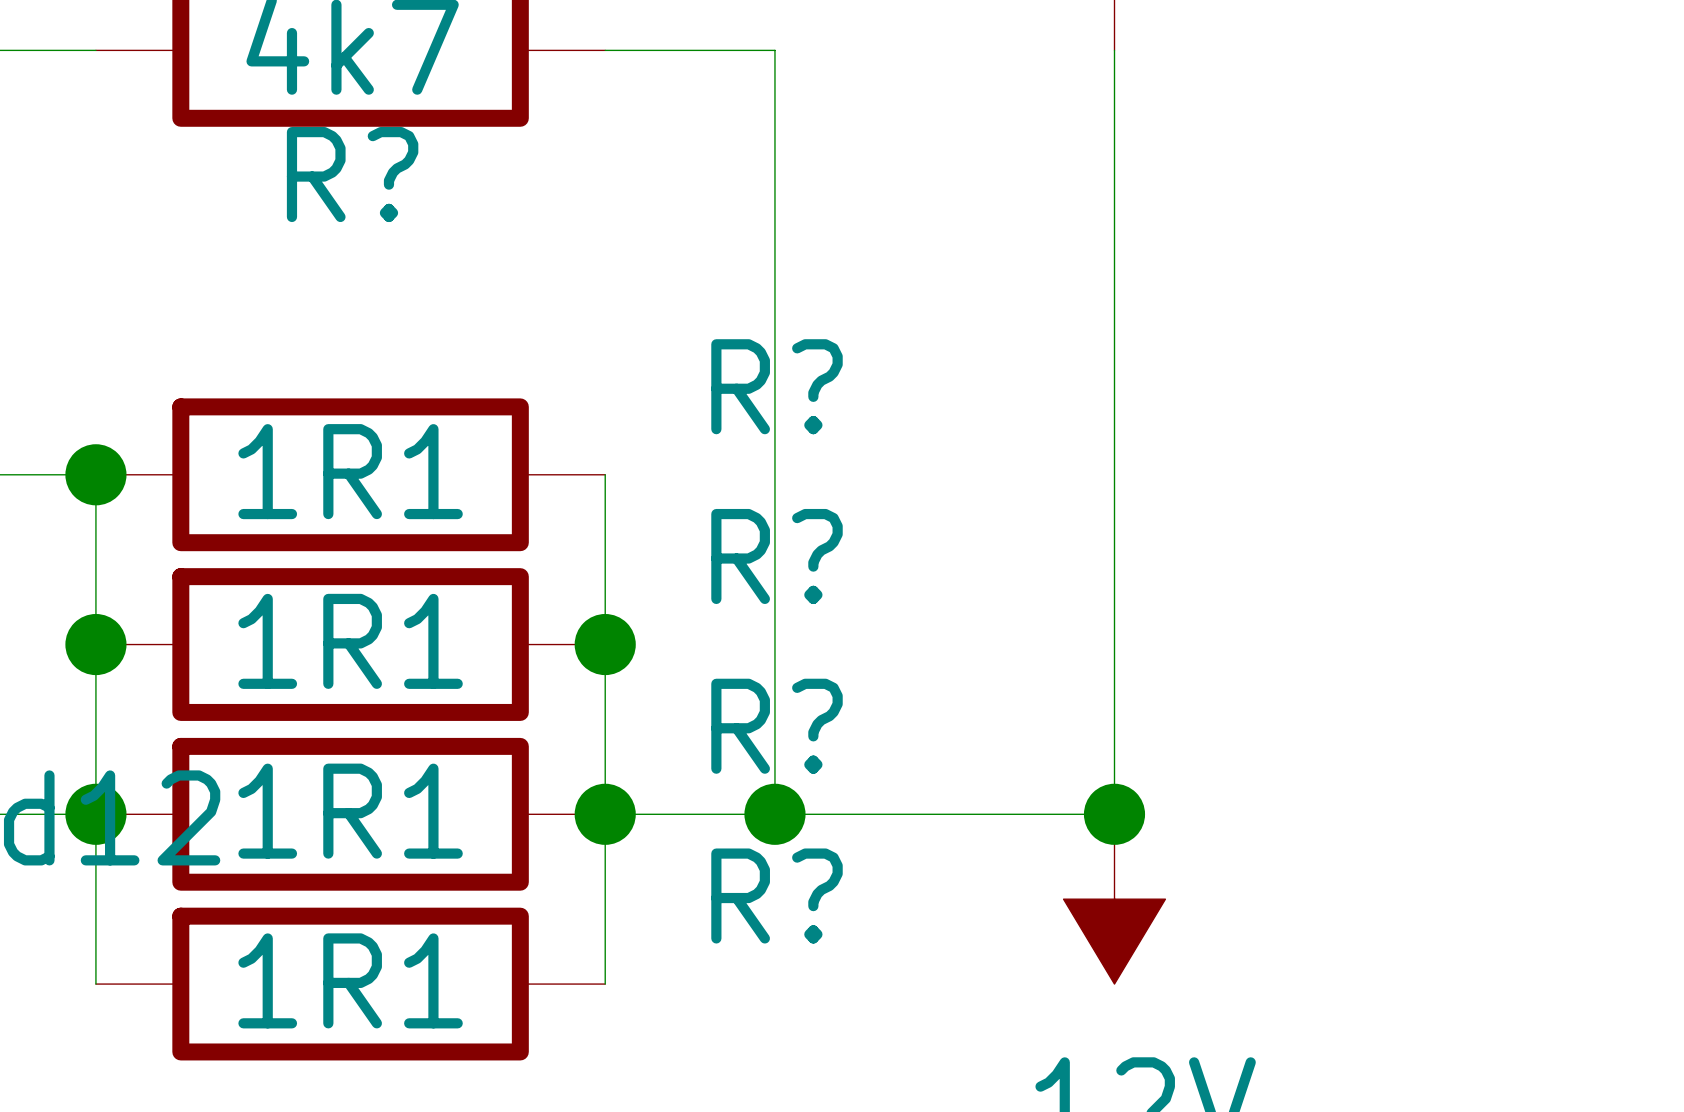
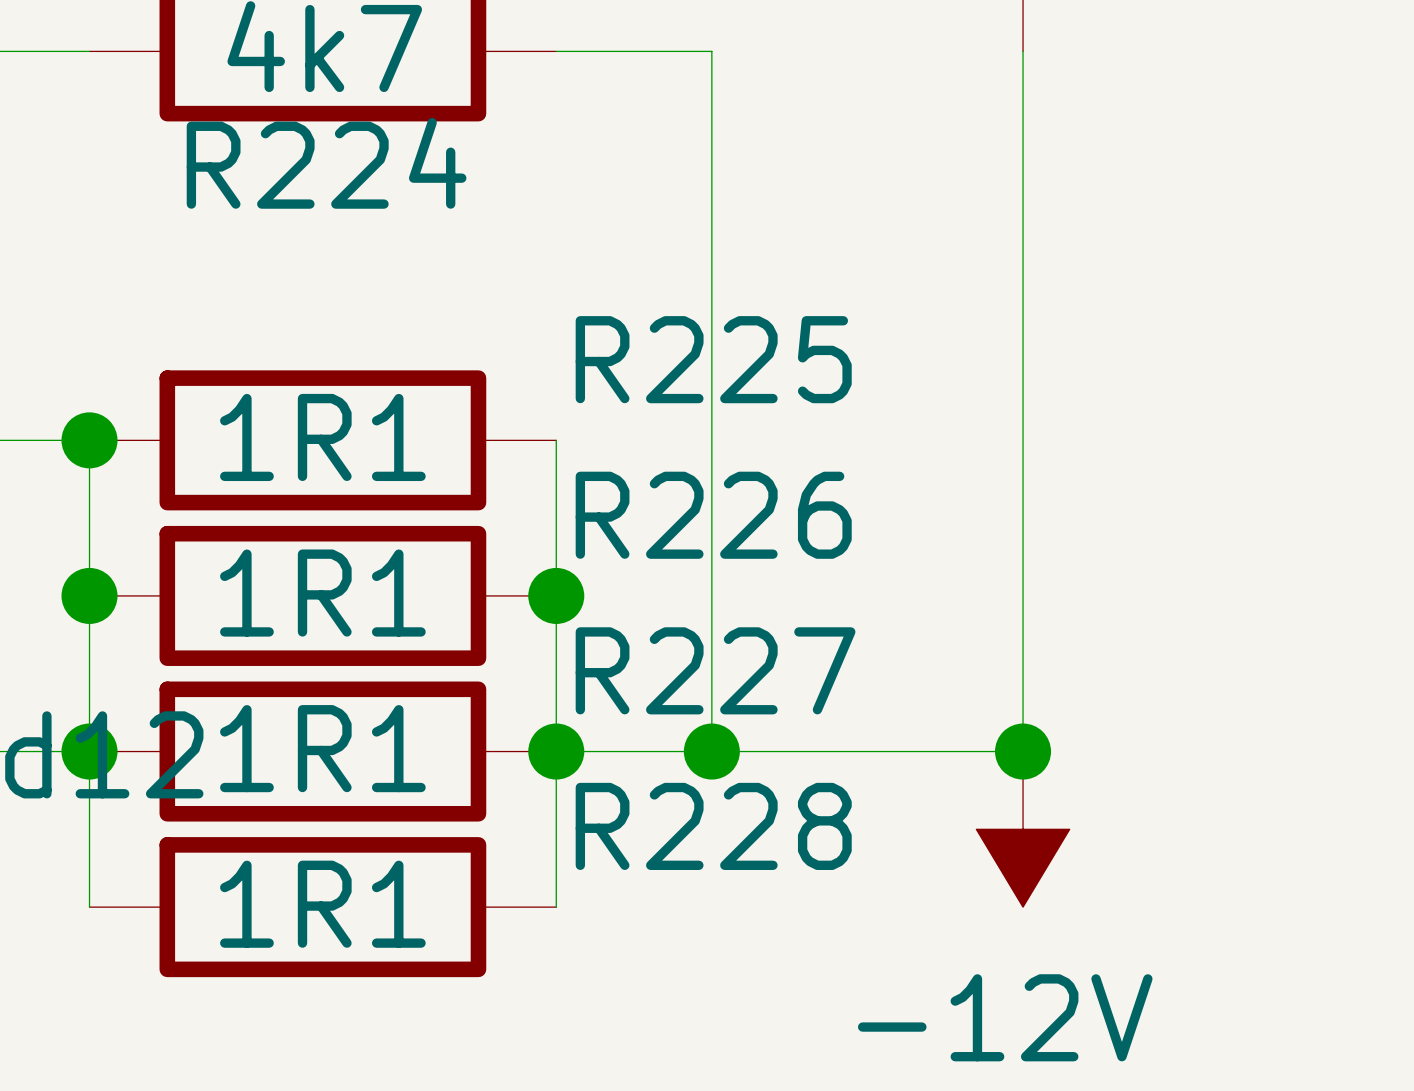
R? name: R? (352, 174) -> R224 (326, 163)
R? name: R? (777, 386) -> R225 (713, 359)
R? name: R? (777, 556) -> R226 (713, 515)
R? name: R? (777, 726) -> R227 (715, 670)
R? name: R? (777, 896) -> R228 (713, 826)

